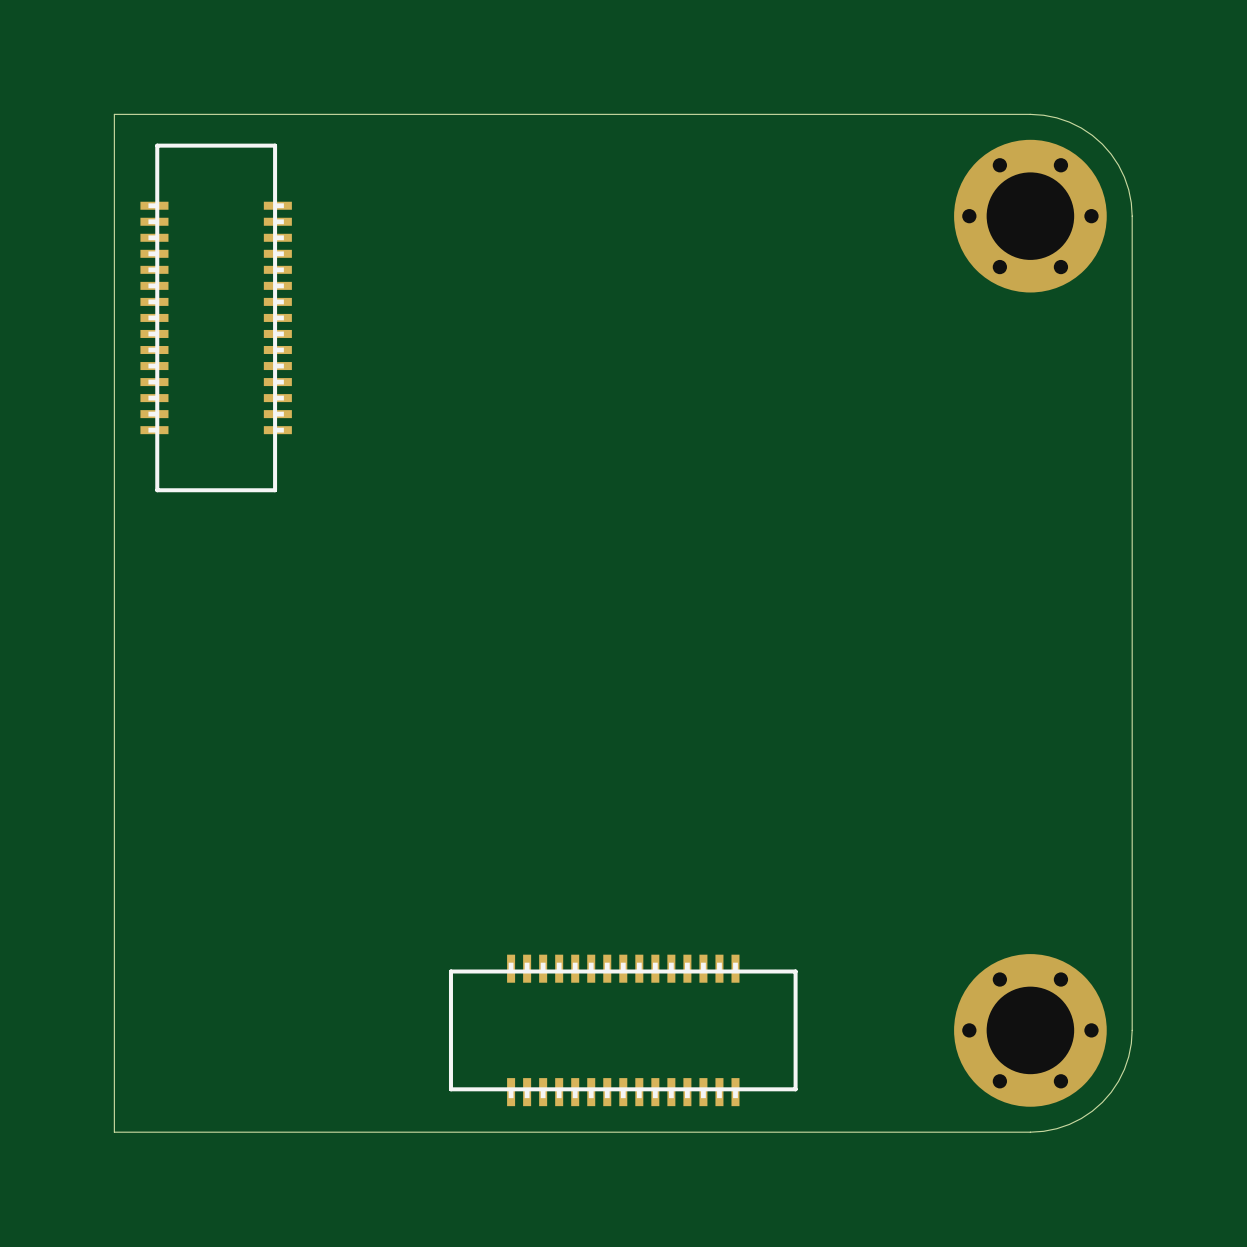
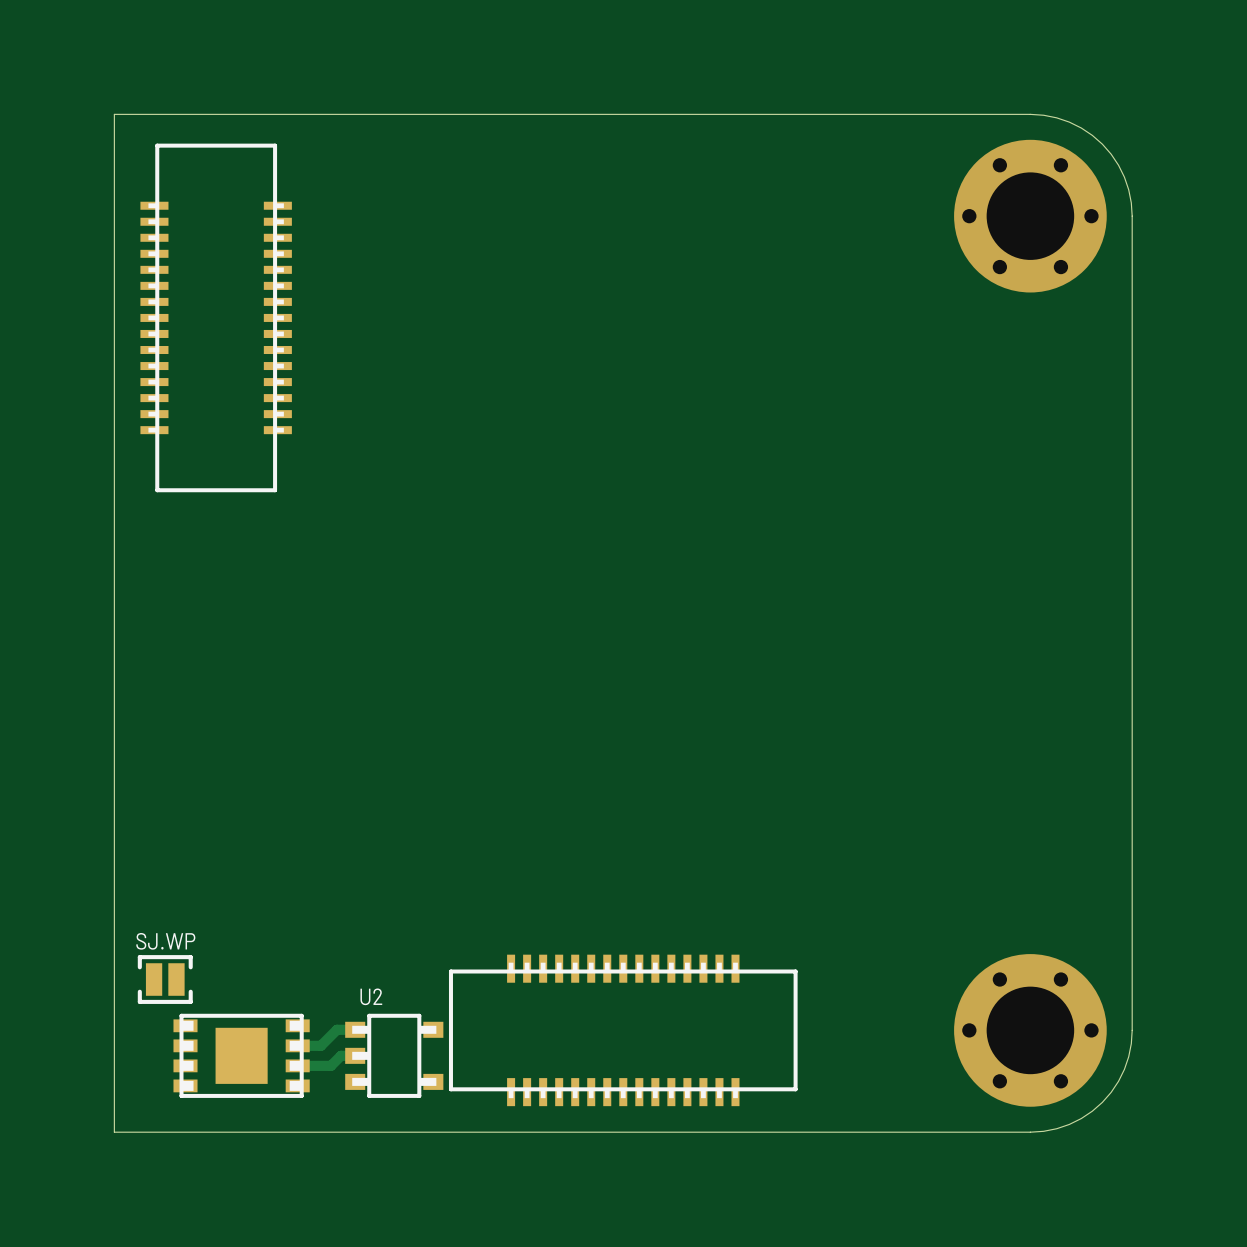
SJ.WP: none -> (165, 979)
track: none -> (355, 1029) (336, 1029) (320, 1045) (297, 1045)
part: none -> (241, 1055)
track: none -> (355, 1055) (340, 1055) (330, 1065) (297, 1065)
U2: none -> (394, 1055)

